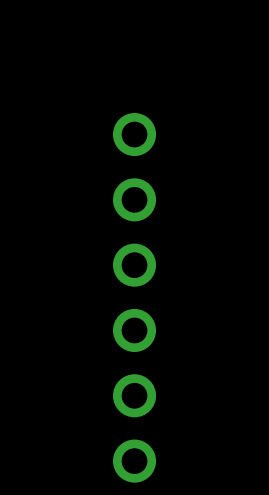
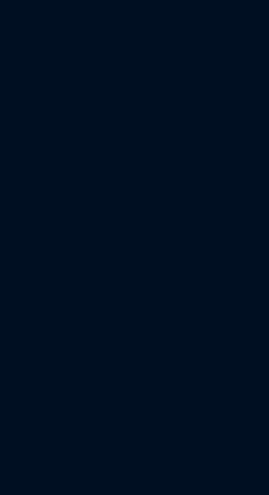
part: (134, 297) -> none

